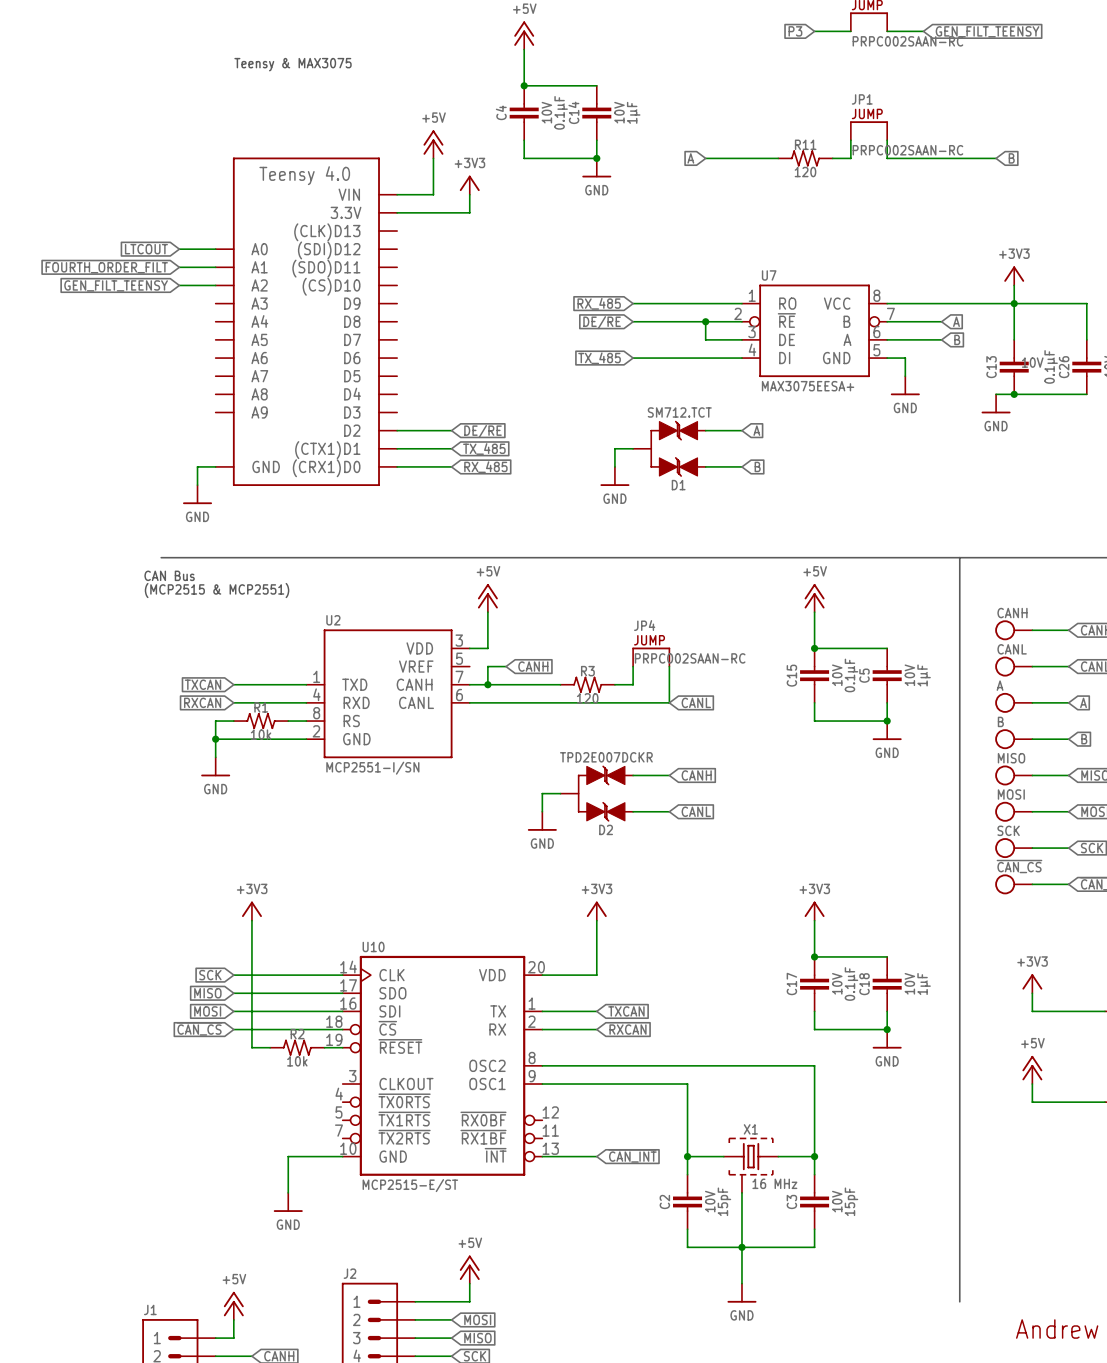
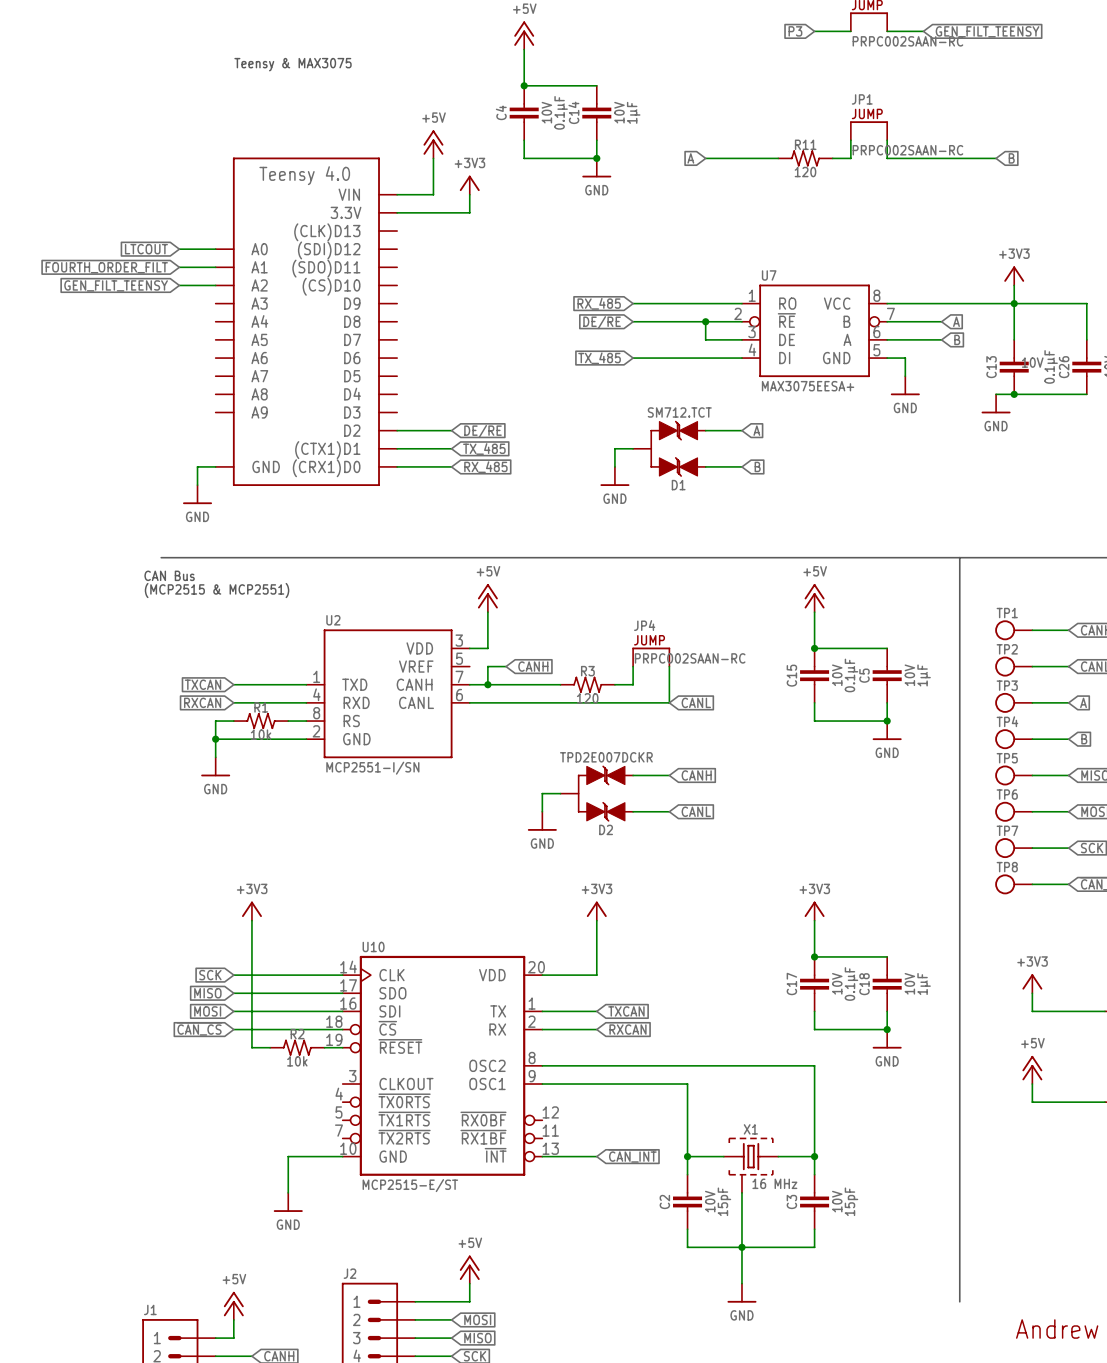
CANH name: CANH (1012, 613) -> TP1 (1007, 613)
CANL name: CANL (1012, 649) -> TP2 (1007, 649)
A name: A (1000, 685) -> TP3 (1007, 685)
B name: B (1000, 721) -> TP4 (1007, 721)
MISO name: MISO (1011, 758) -> TP5 (1007, 758)
MOSI name: MOSI (1011, 794) -> TP6 (1007, 794)
SCK name: SCK (1008, 830) -> TP7 (1007, 830)
~{CAN_CS} name: ~{CAN_CS} (1019, 866) -> TP8 (1007, 867)

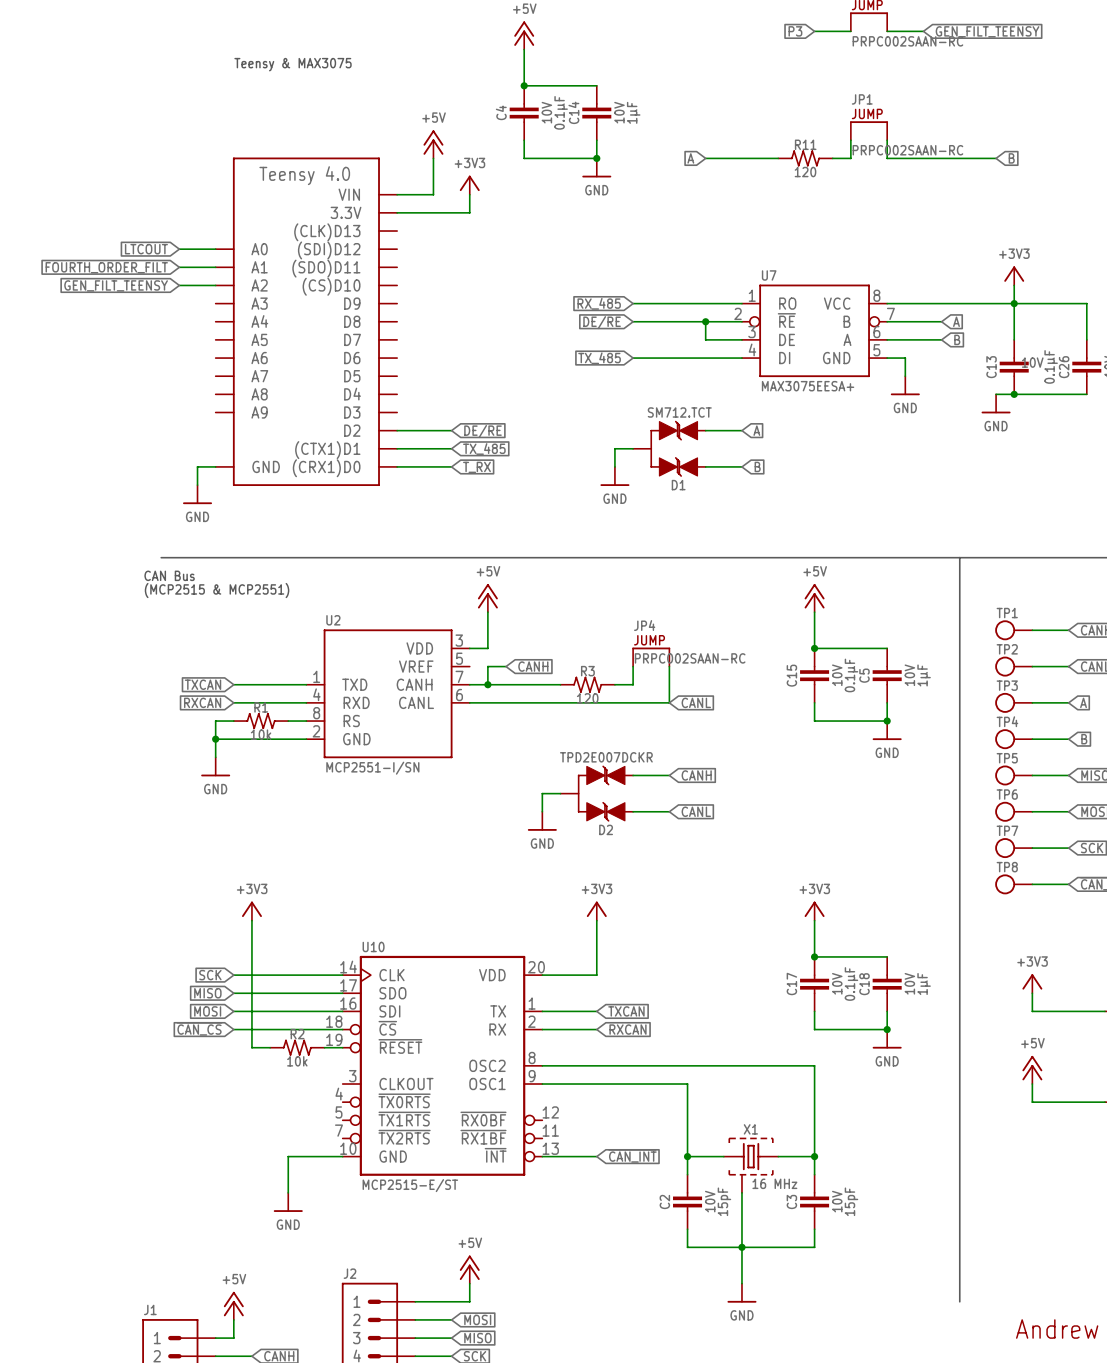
global label: RX_485 (485, 467) -> T_RX (476, 467)

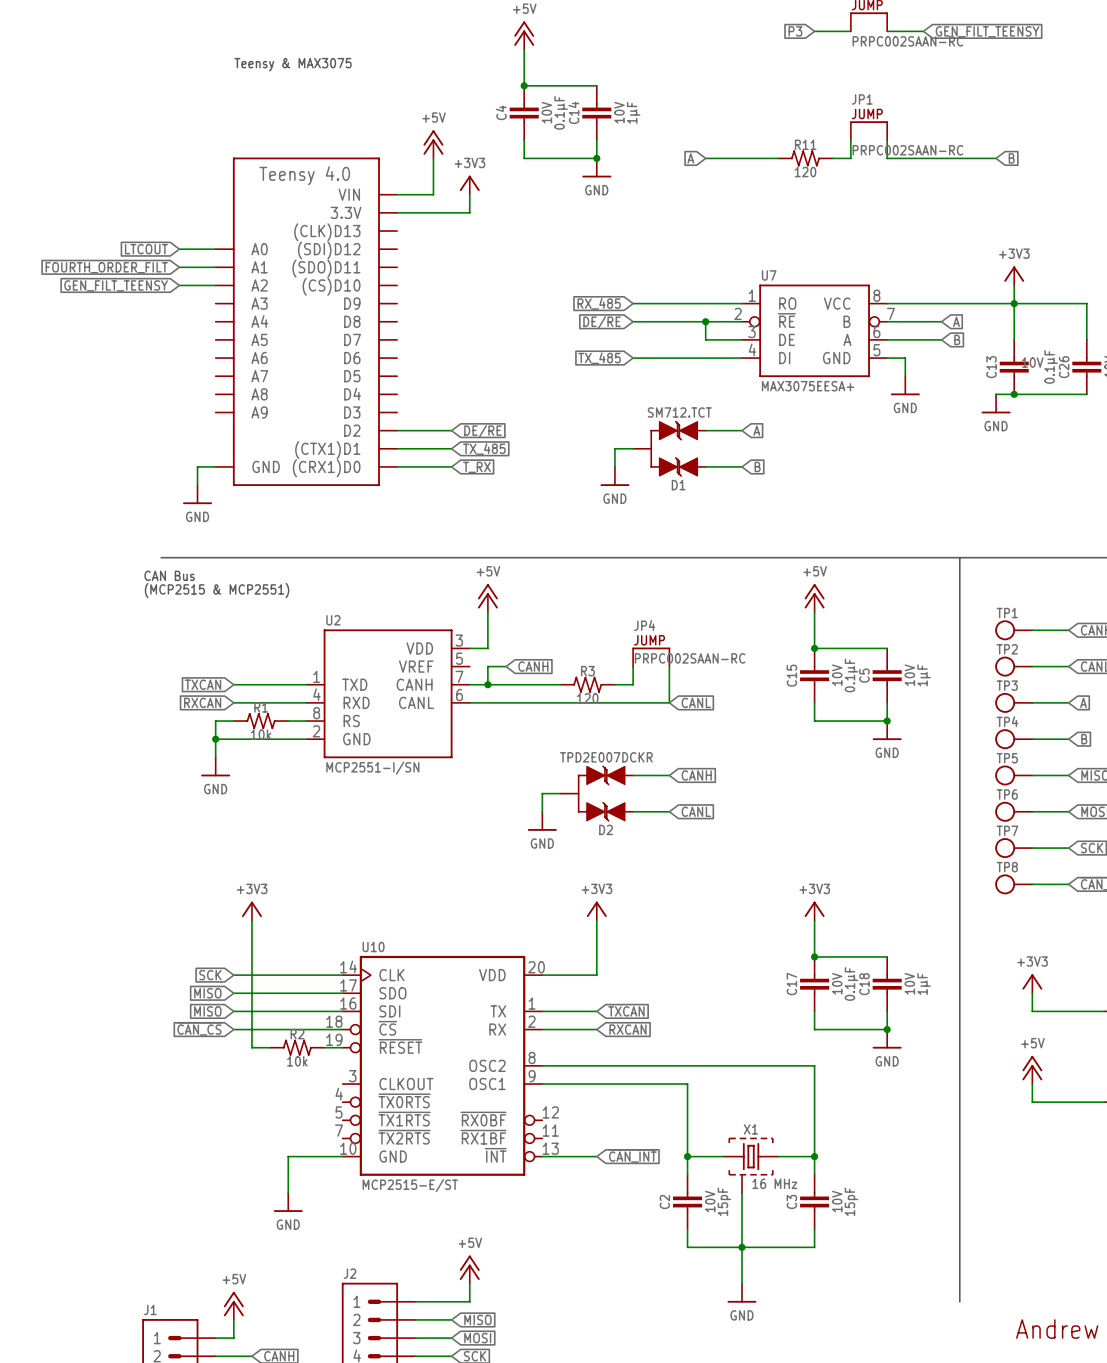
global label: MOSI (207, 1011) -> MISO (207, 1011)
global label: MOSI (477, 1319) -> MISO (477, 1319)
global label: MISO (477, 1338) -> MOSI (477, 1338)

